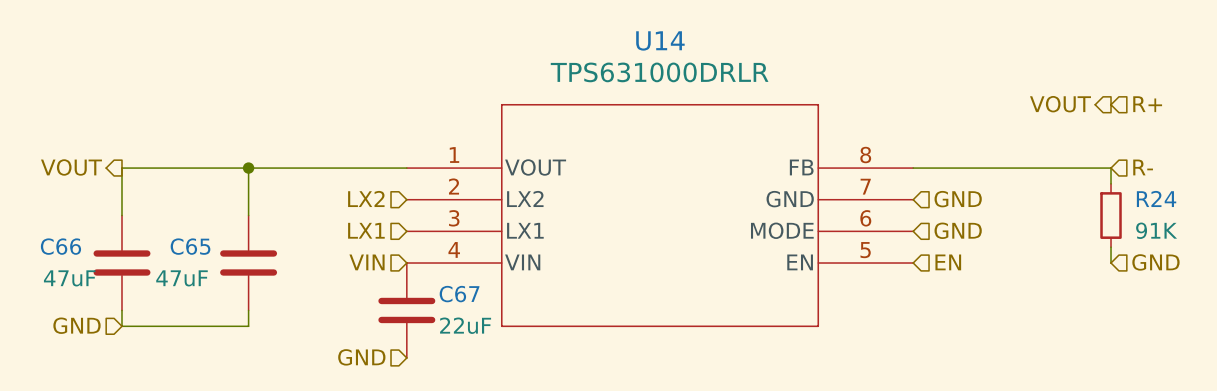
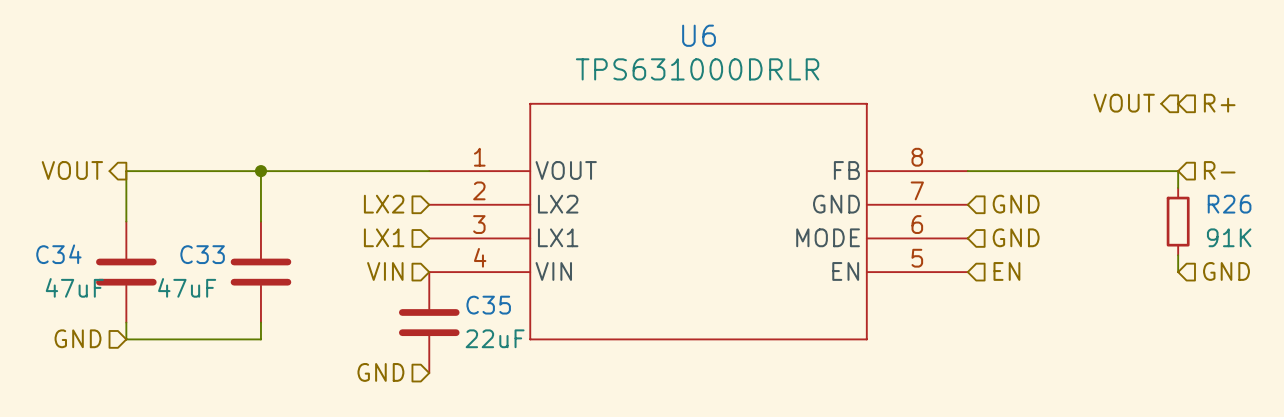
U14 name: U14 (660, 40) -> U6 (699, 35)
R24 name: R24 (1156, 198) -> R26 (1229, 204)
C66 name: C66 (60, 246) -> C34 (58, 254)
C65 name: C65 (190, 246) -> C33 (202, 254)
C67 name: C67 (459, 294) -> C35 (488, 305)

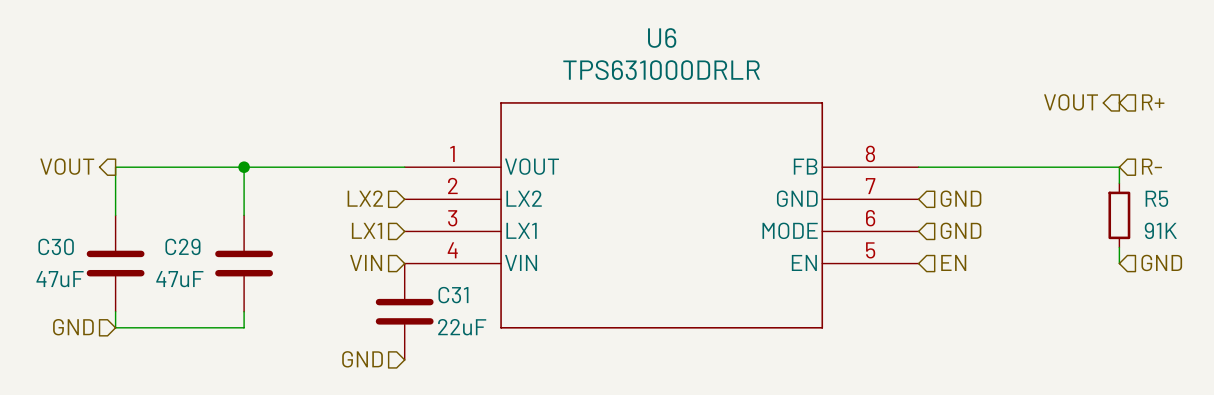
R26 name: R26 (1229, 204) -> R5 (1156, 198)
C34 name: C34 (58, 254) -> C30 (56, 246)
C33 name: C33 (202, 254) -> C29 (182, 246)
C35 name: C35 (488, 305) -> C31 (453, 295)

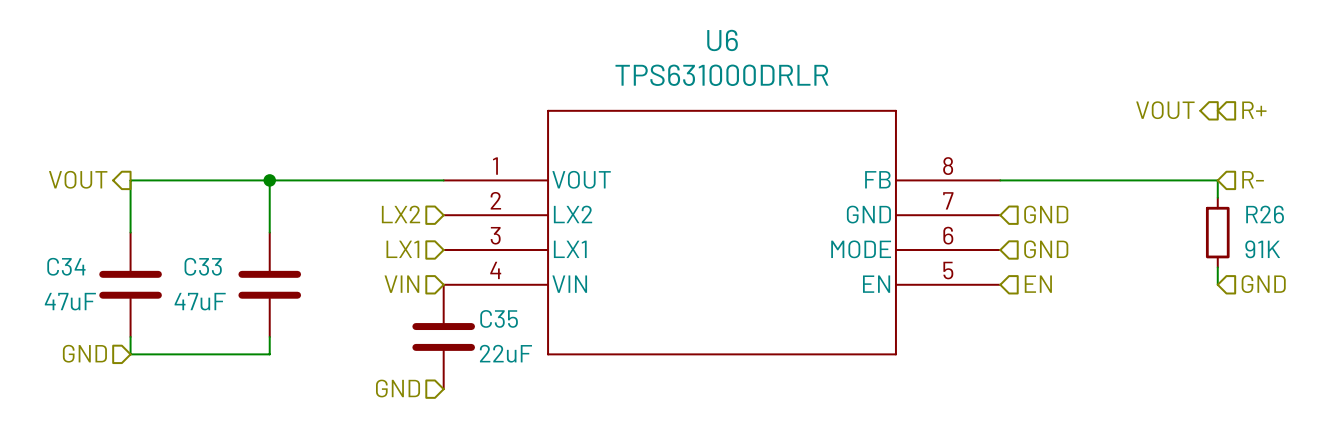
R5 name: R5 (1156, 198) -> R26 (1265, 214)
C30 name: C30 (56, 246) -> C34 (66, 266)
C29 name: C29 (182, 246) -> C33 (203, 266)
C31 name: C31 (453, 295) -> C35 (499, 318)

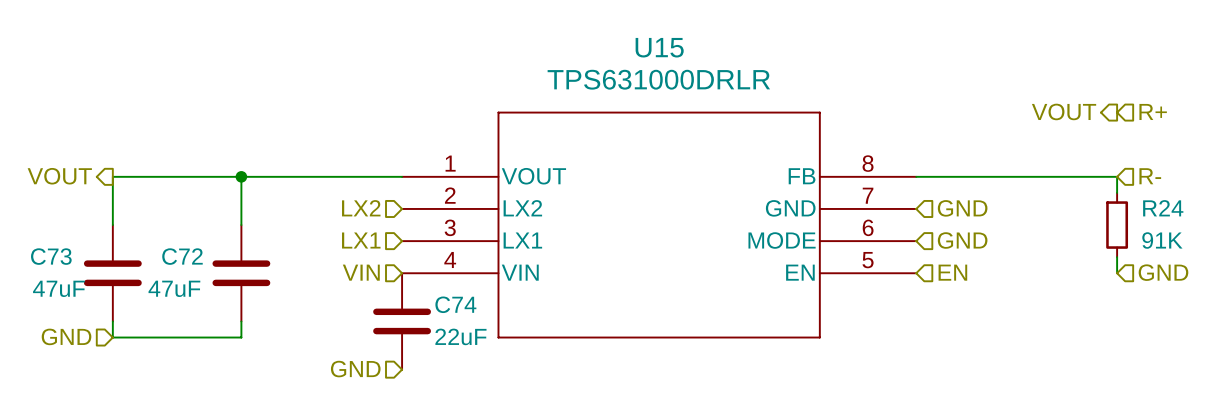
U6 name: U6 (722, 40) -> U15 (659, 47)
R26 name: R26 (1265, 214) -> R24 (1163, 208)
C34 name: C34 (66, 266) -> C73 (51, 256)
C33 name: C33 (203, 266) -> C72 (182, 256)
C35 name: C35 (499, 318) -> C74 (455, 304)

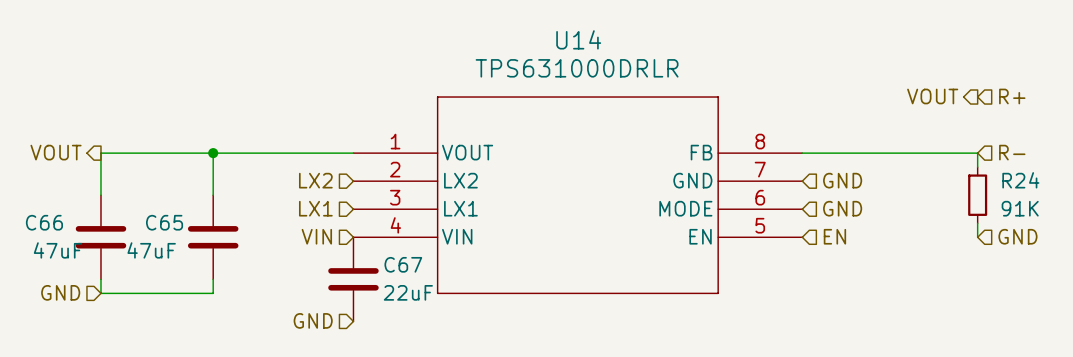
U15 name: U15 (659, 47) -> U14 (578, 39)
C73 name: C73 (51, 256) -> C66 (44, 222)
C72 name: C72 (182, 256) -> C65 (164, 222)
C74 name: C74 (455, 304) -> C67 (403, 264)

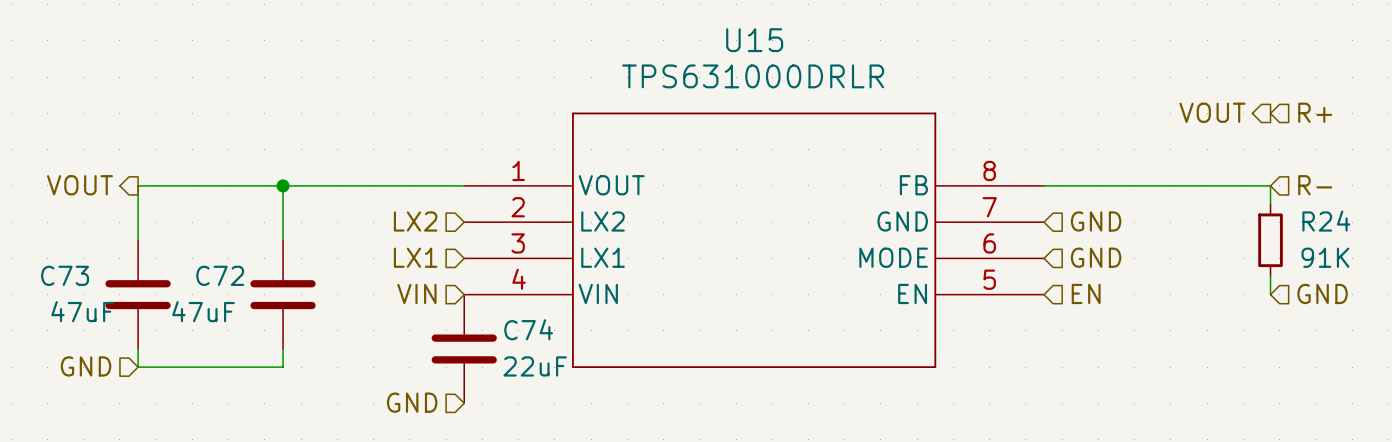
U14 name: U14 (578, 39) -> U15 (754, 40)
C66 name: C66 (44, 222) -> C73 (65, 275)
C65 name: C65 (164, 222) -> C72 (220, 275)
C67 name: C67 (403, 264) -> C74 (528, 329)

